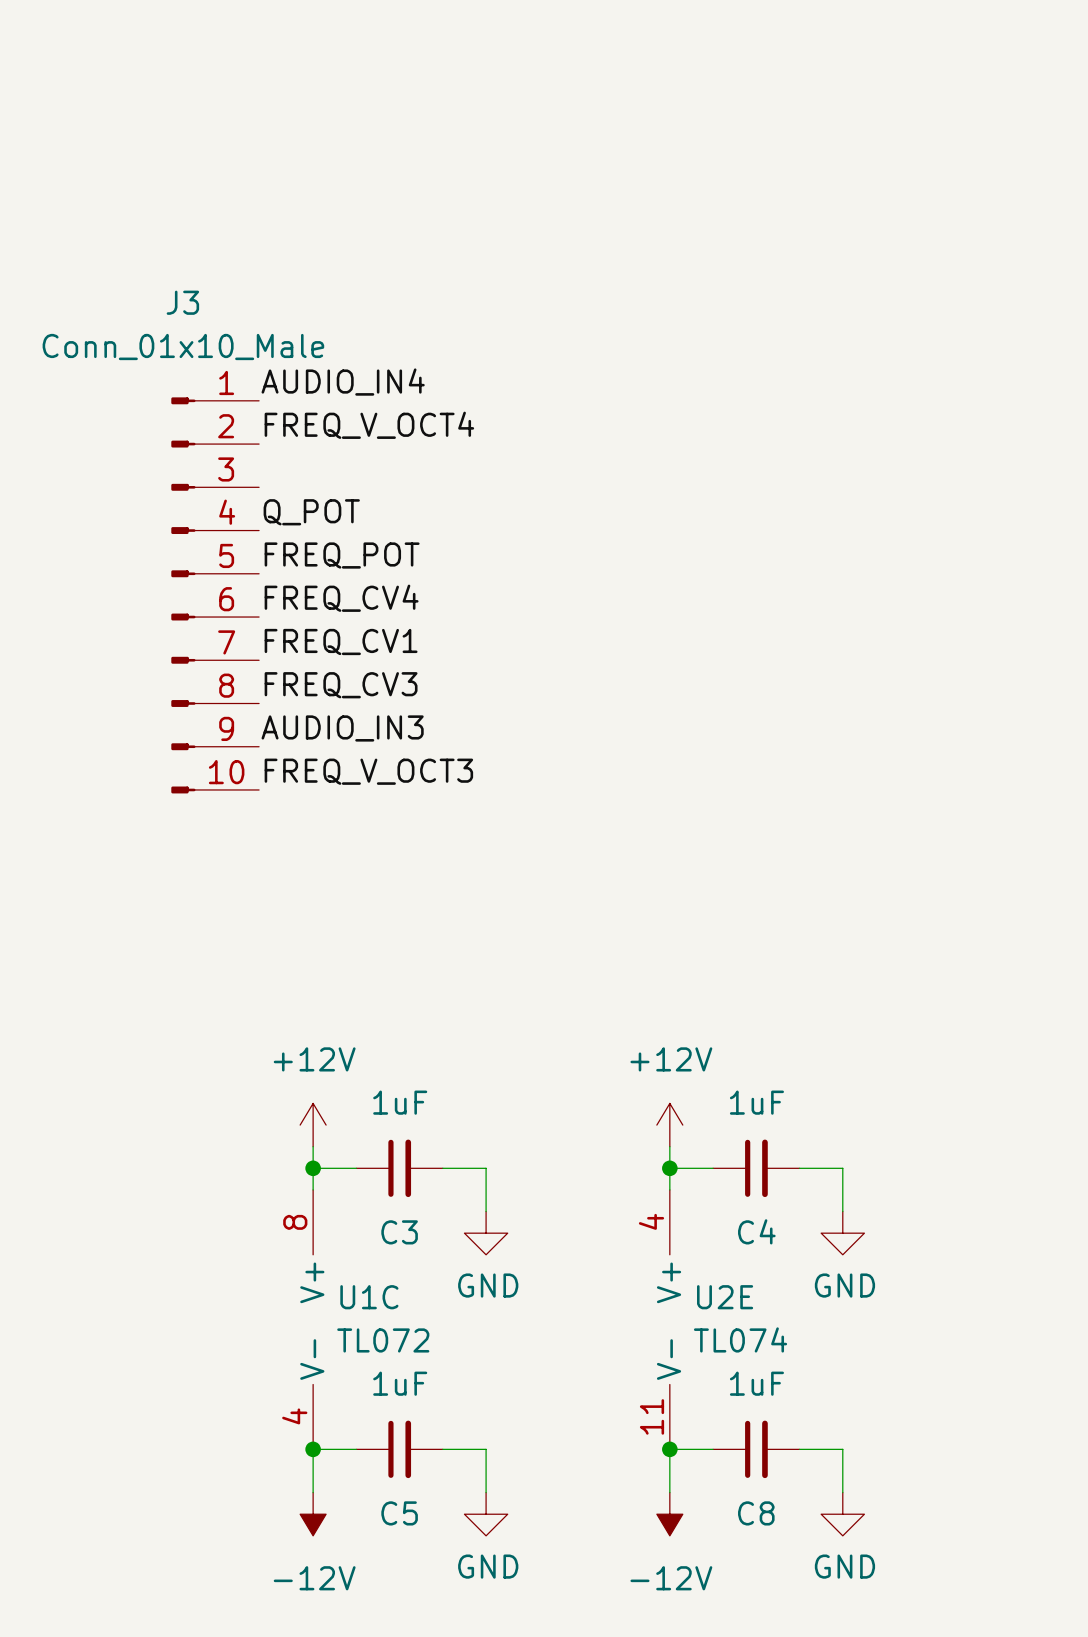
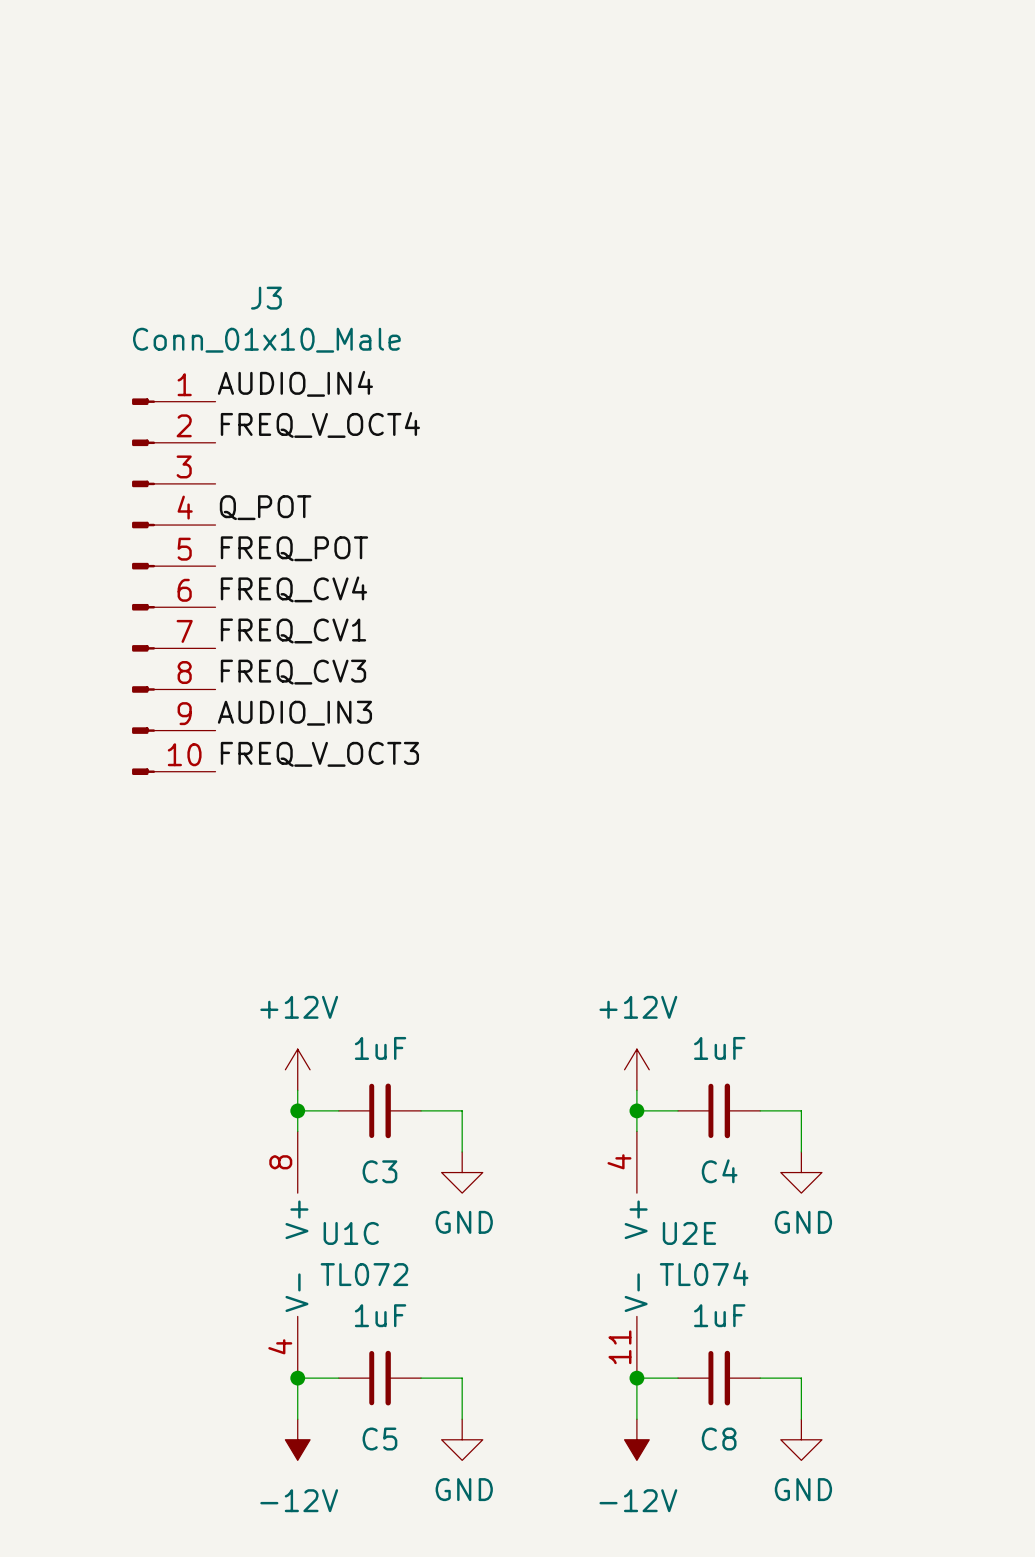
J3 name position: J3 (182, 302) -> J3 (266, 298)
J3 value position: Conn_01x10_Male (183, 347) -> Conn_01x10_Male (266, 340)
label position: AUDIO_IN4 (343, 382) -> AUDIO_IN4 (295, 383)
label position: FREQ_V_OCT4 (369, 425) -> FREQ_V_OCT4 (320, 424)
label position: Q_POT (311, 512) -> Q_POT (265, 507)
label position: FREQ_POT (342, 555) -> FREQ_POT (294, 548)
J3 position: (215, 595) -> (173, 586)
label position: FREQ_CV4 (341, 598) -> FREQ_CV4 (293, 589)
label position: FREQ_CV1 (341, 642) -> FREQ_CV1 (293, 631)
label position: FREQ_CV3 (341, 685) -> FREQ_CV3 (293, 672)
label position: AUDIO_IN3 (342, 728) -> AUDIO_IN3 (294, 713)
label position: FREQ_V_OCT3 (368, 771) -> FREQ_V_OCT3 (319, 754)

